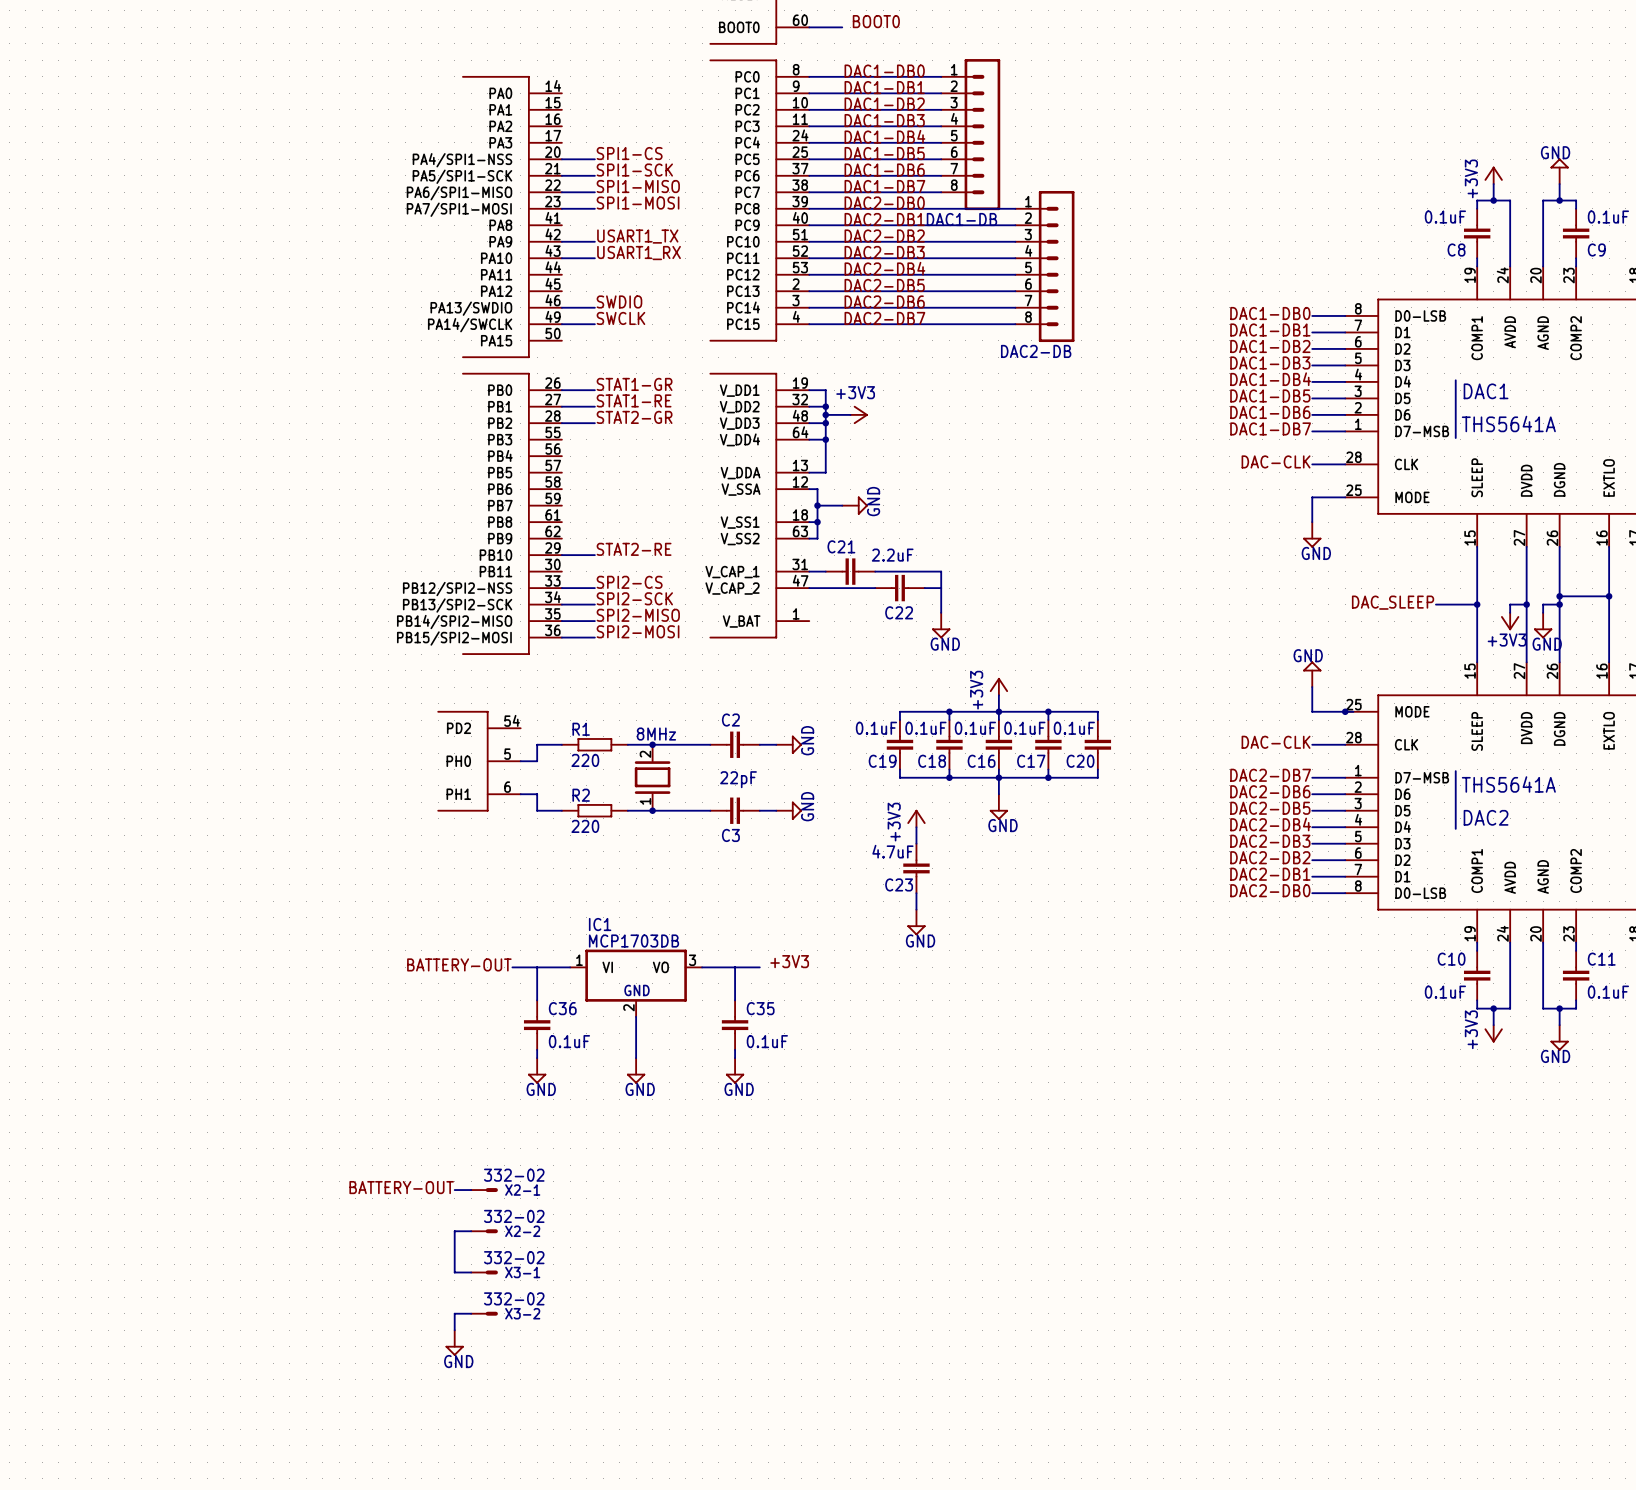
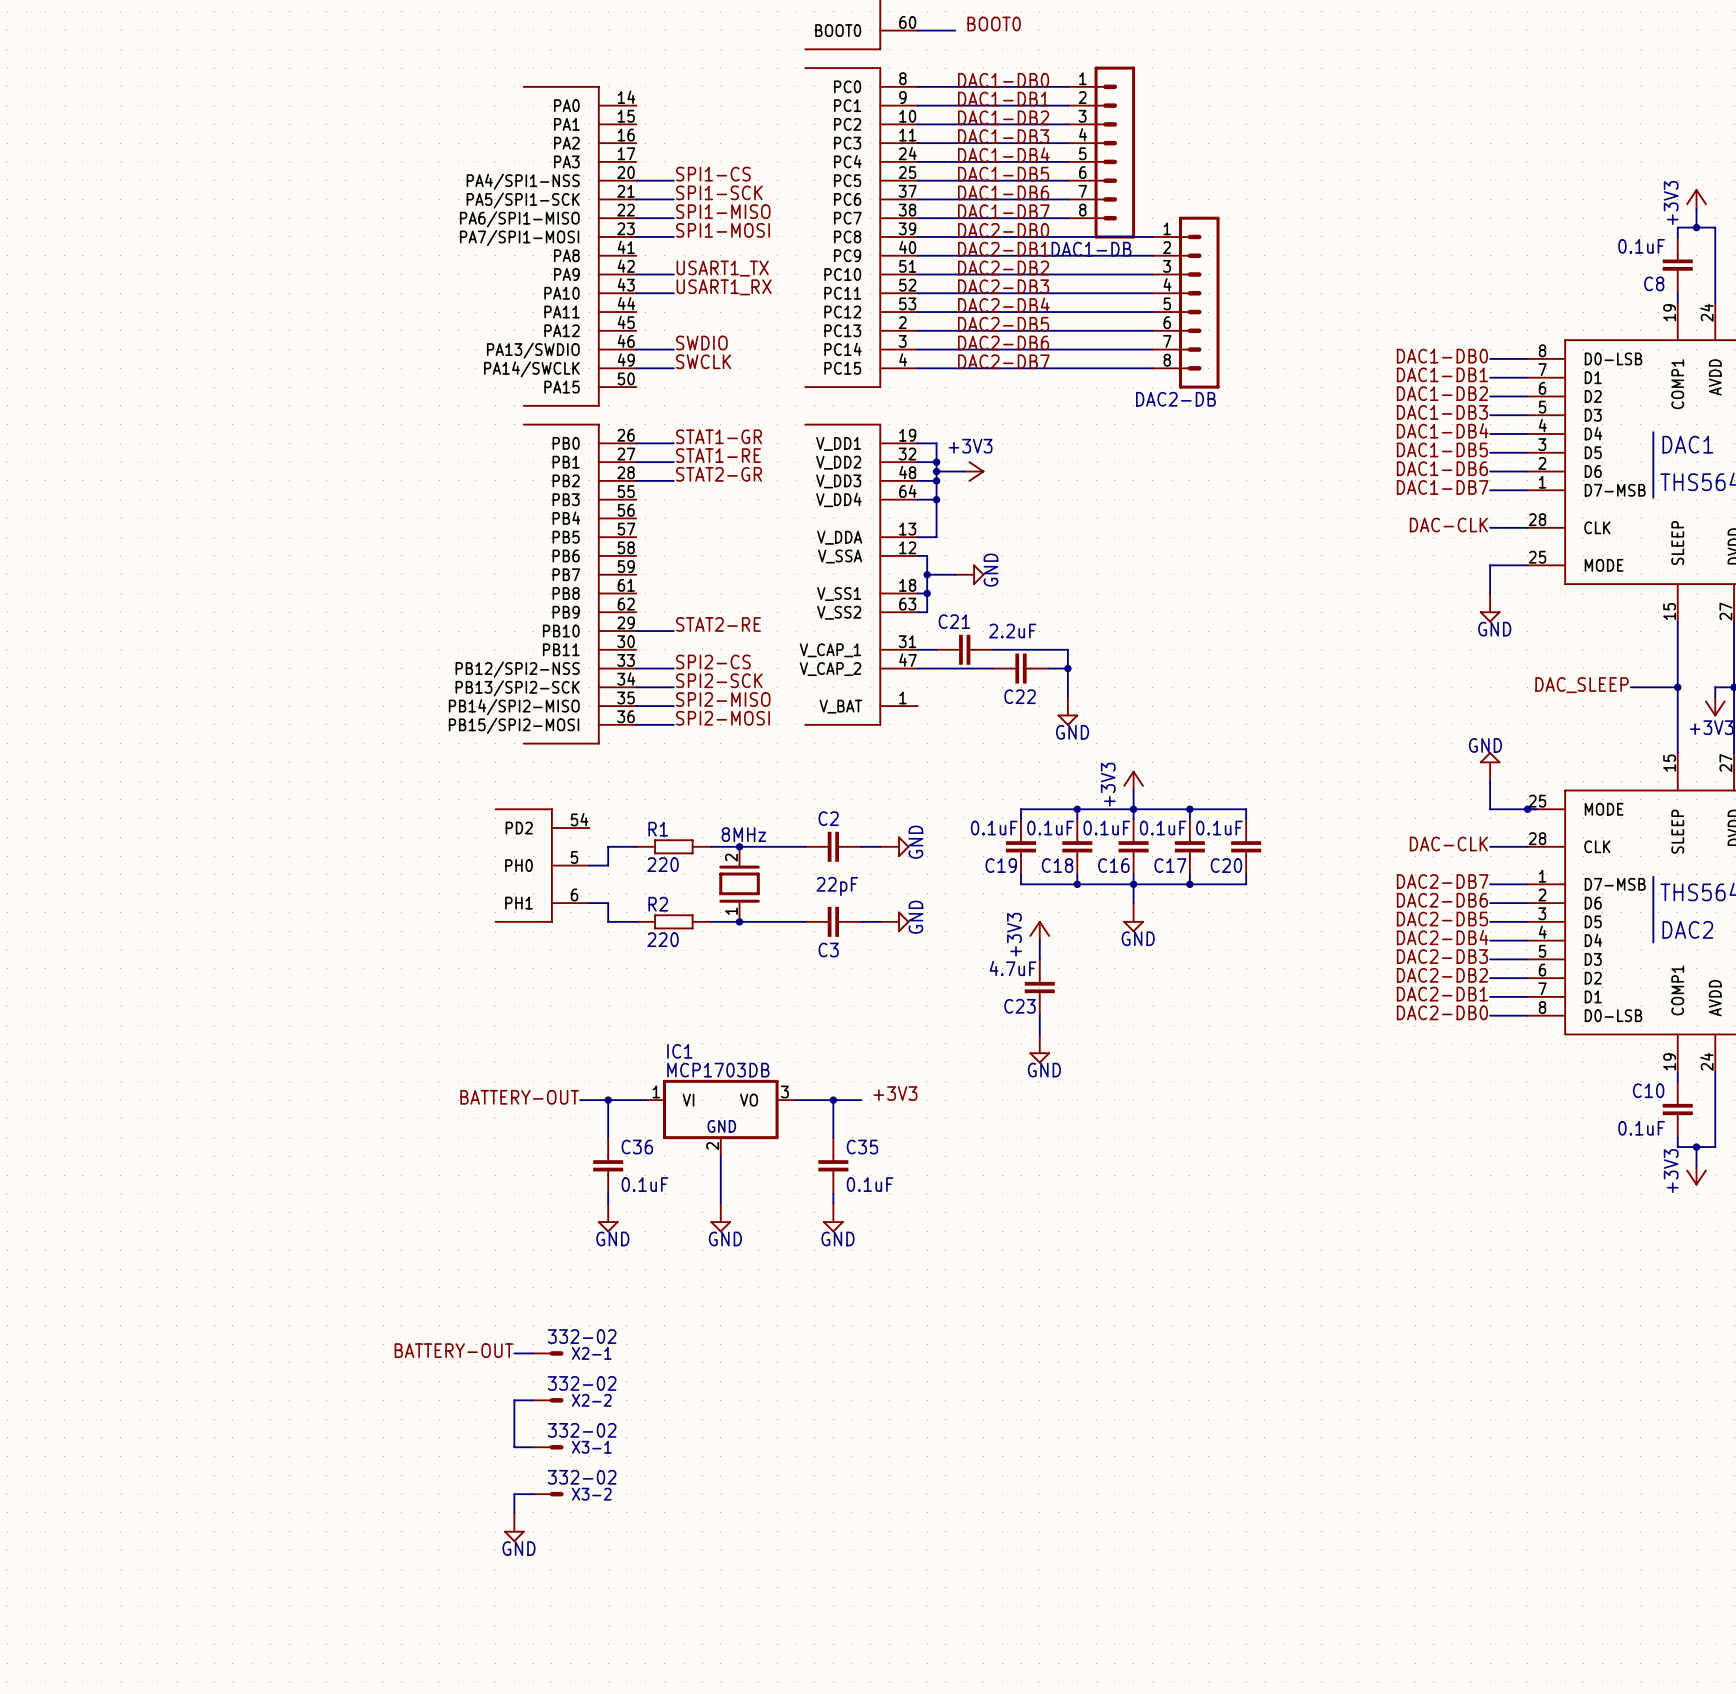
junction: none -> (1067, 668)
junction: none -> (608, 1100)
junction: none -> (833, 1100)

